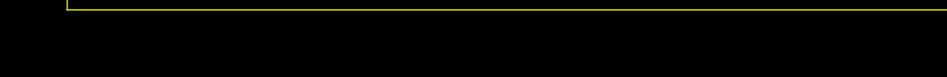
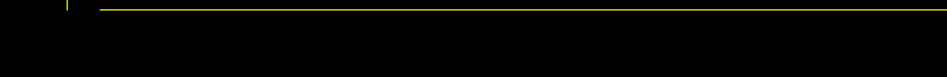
board edge: (67, 9) (100, 9) -> none

